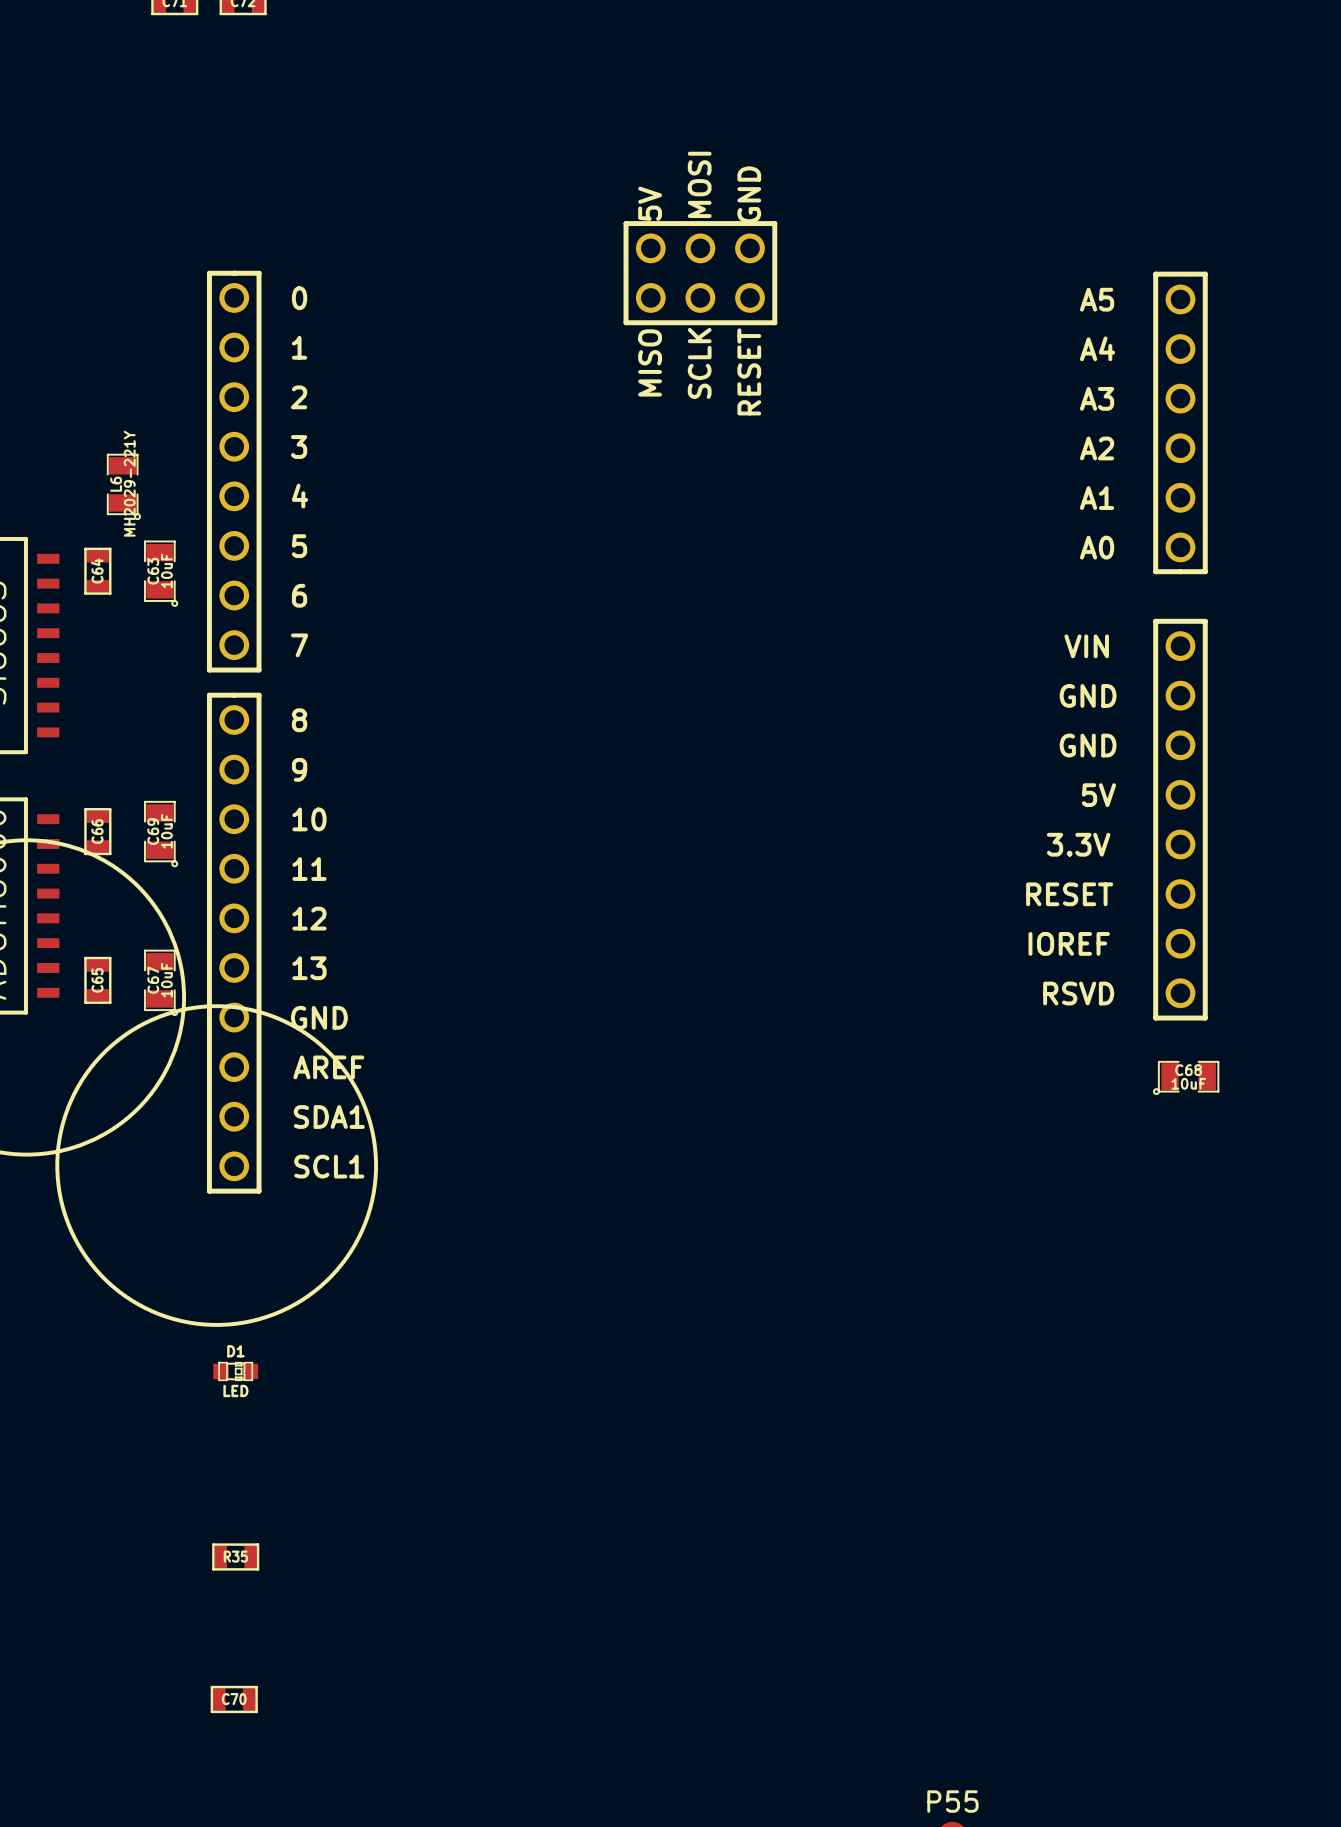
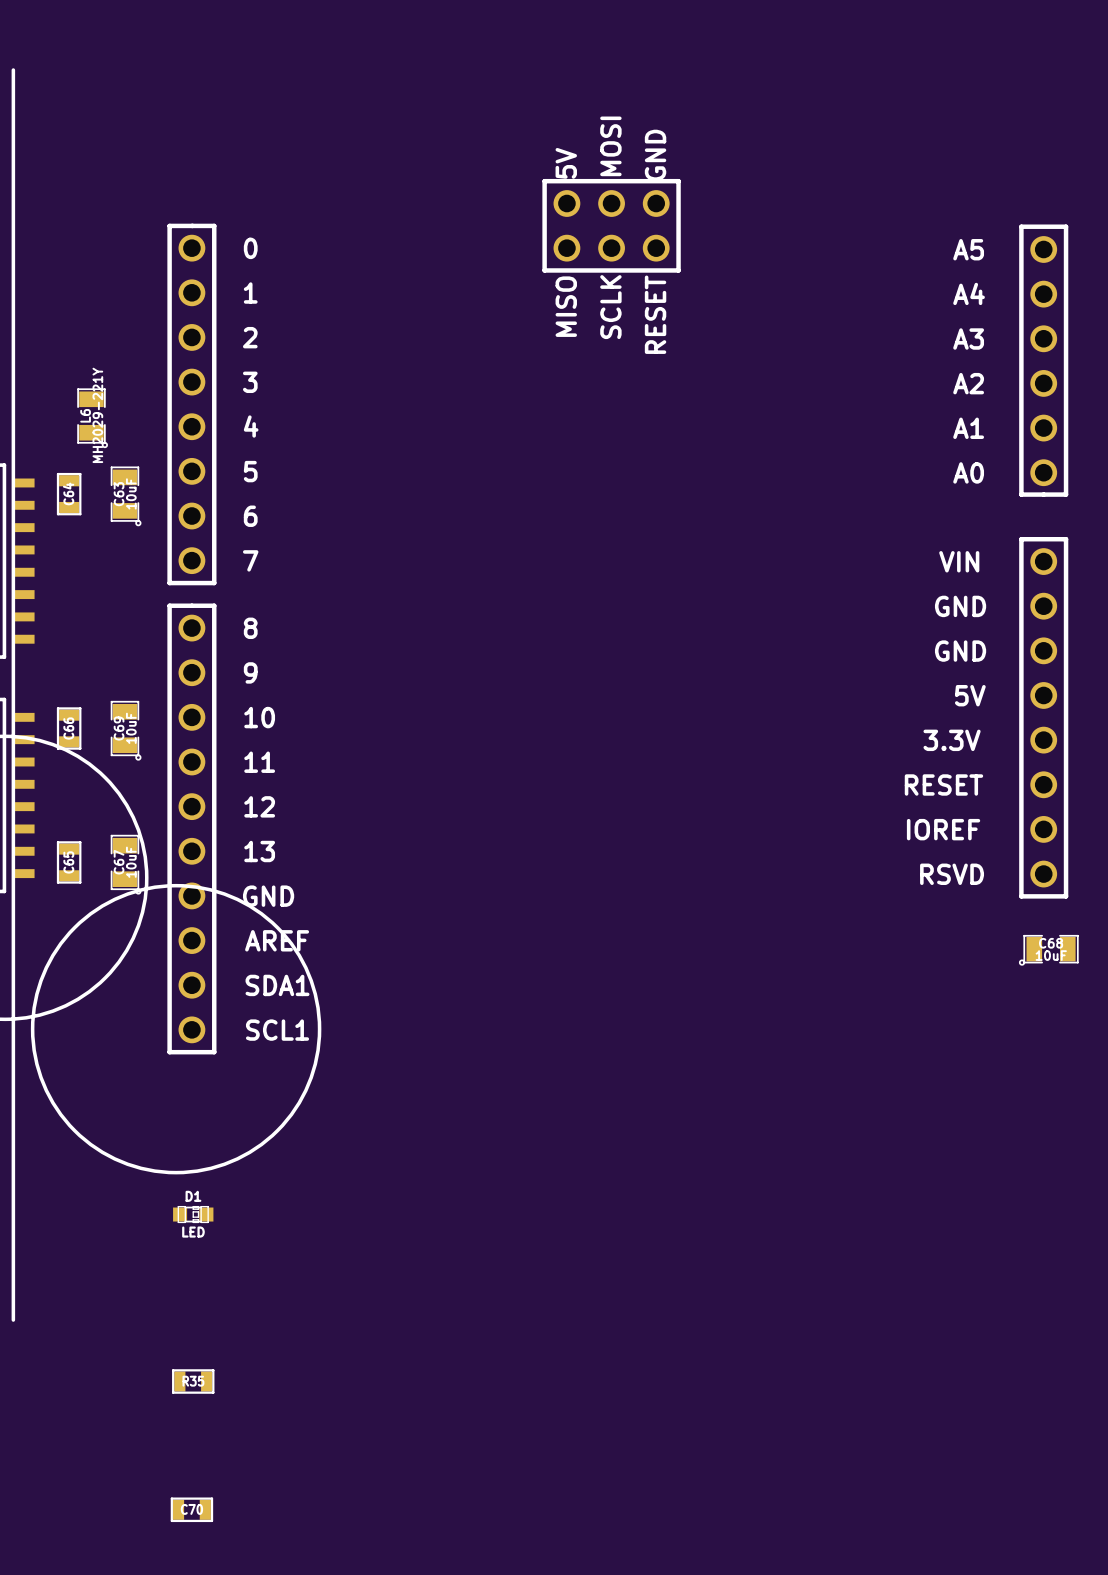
line: none -> (13, 70) (13, 1320)

